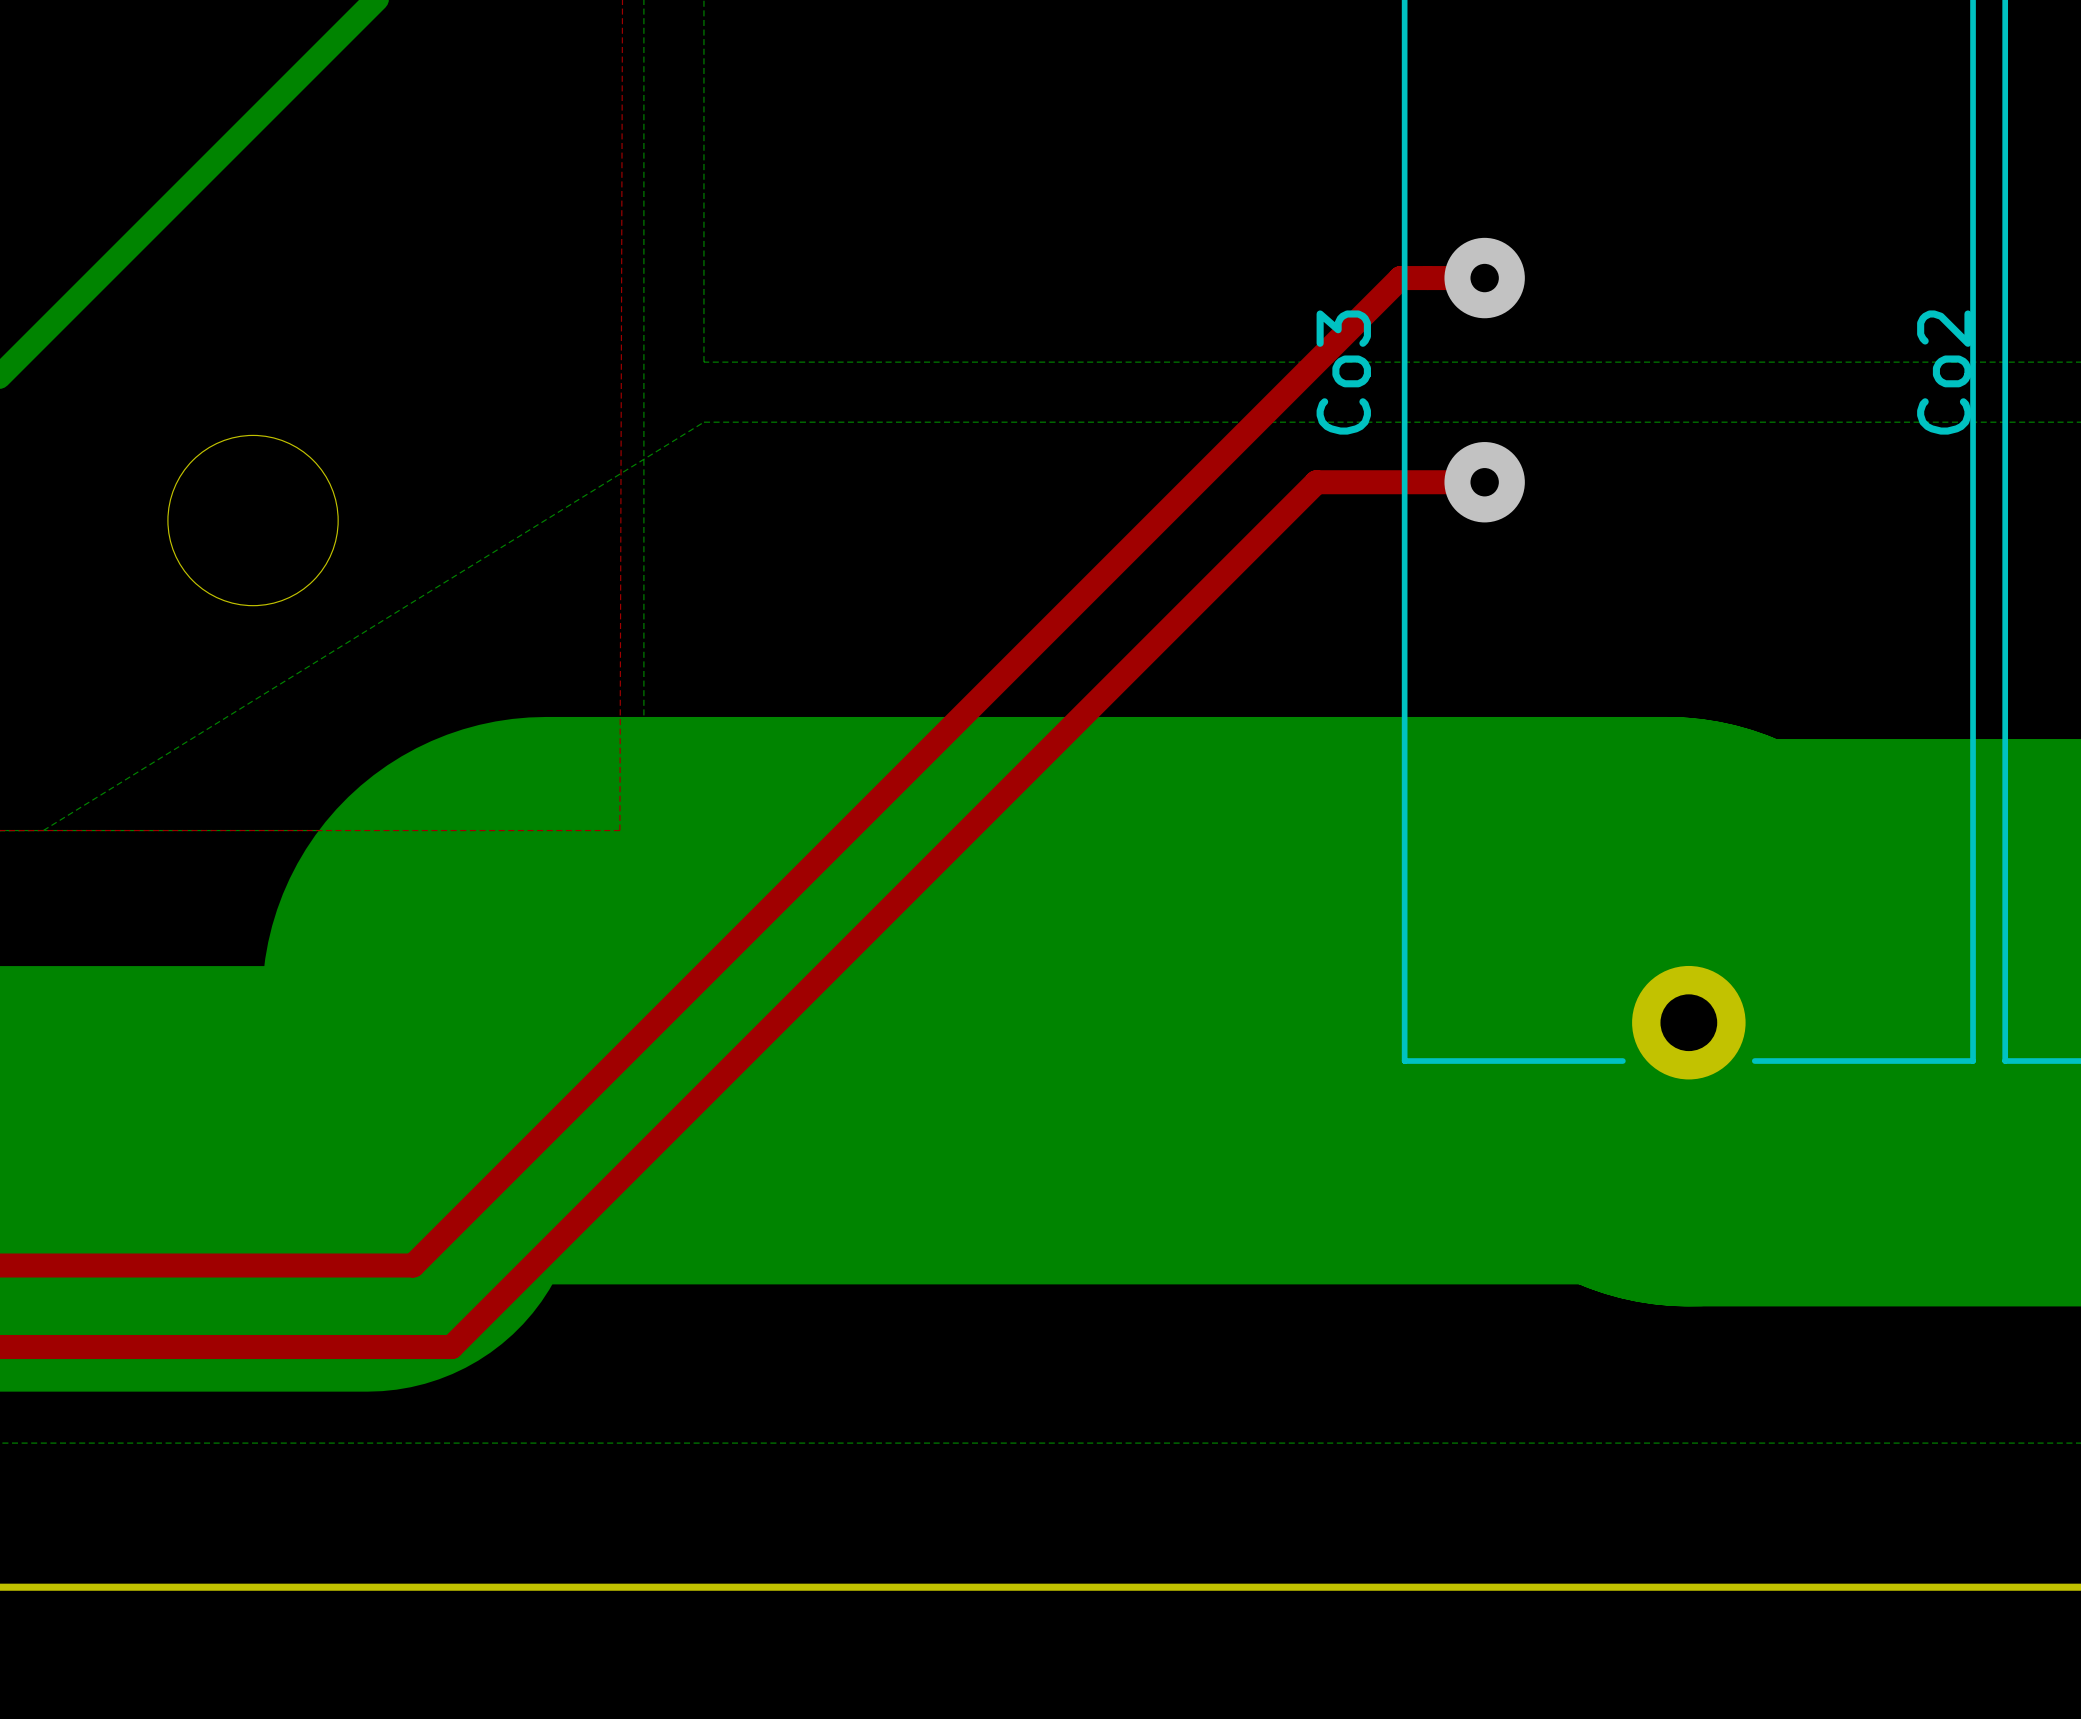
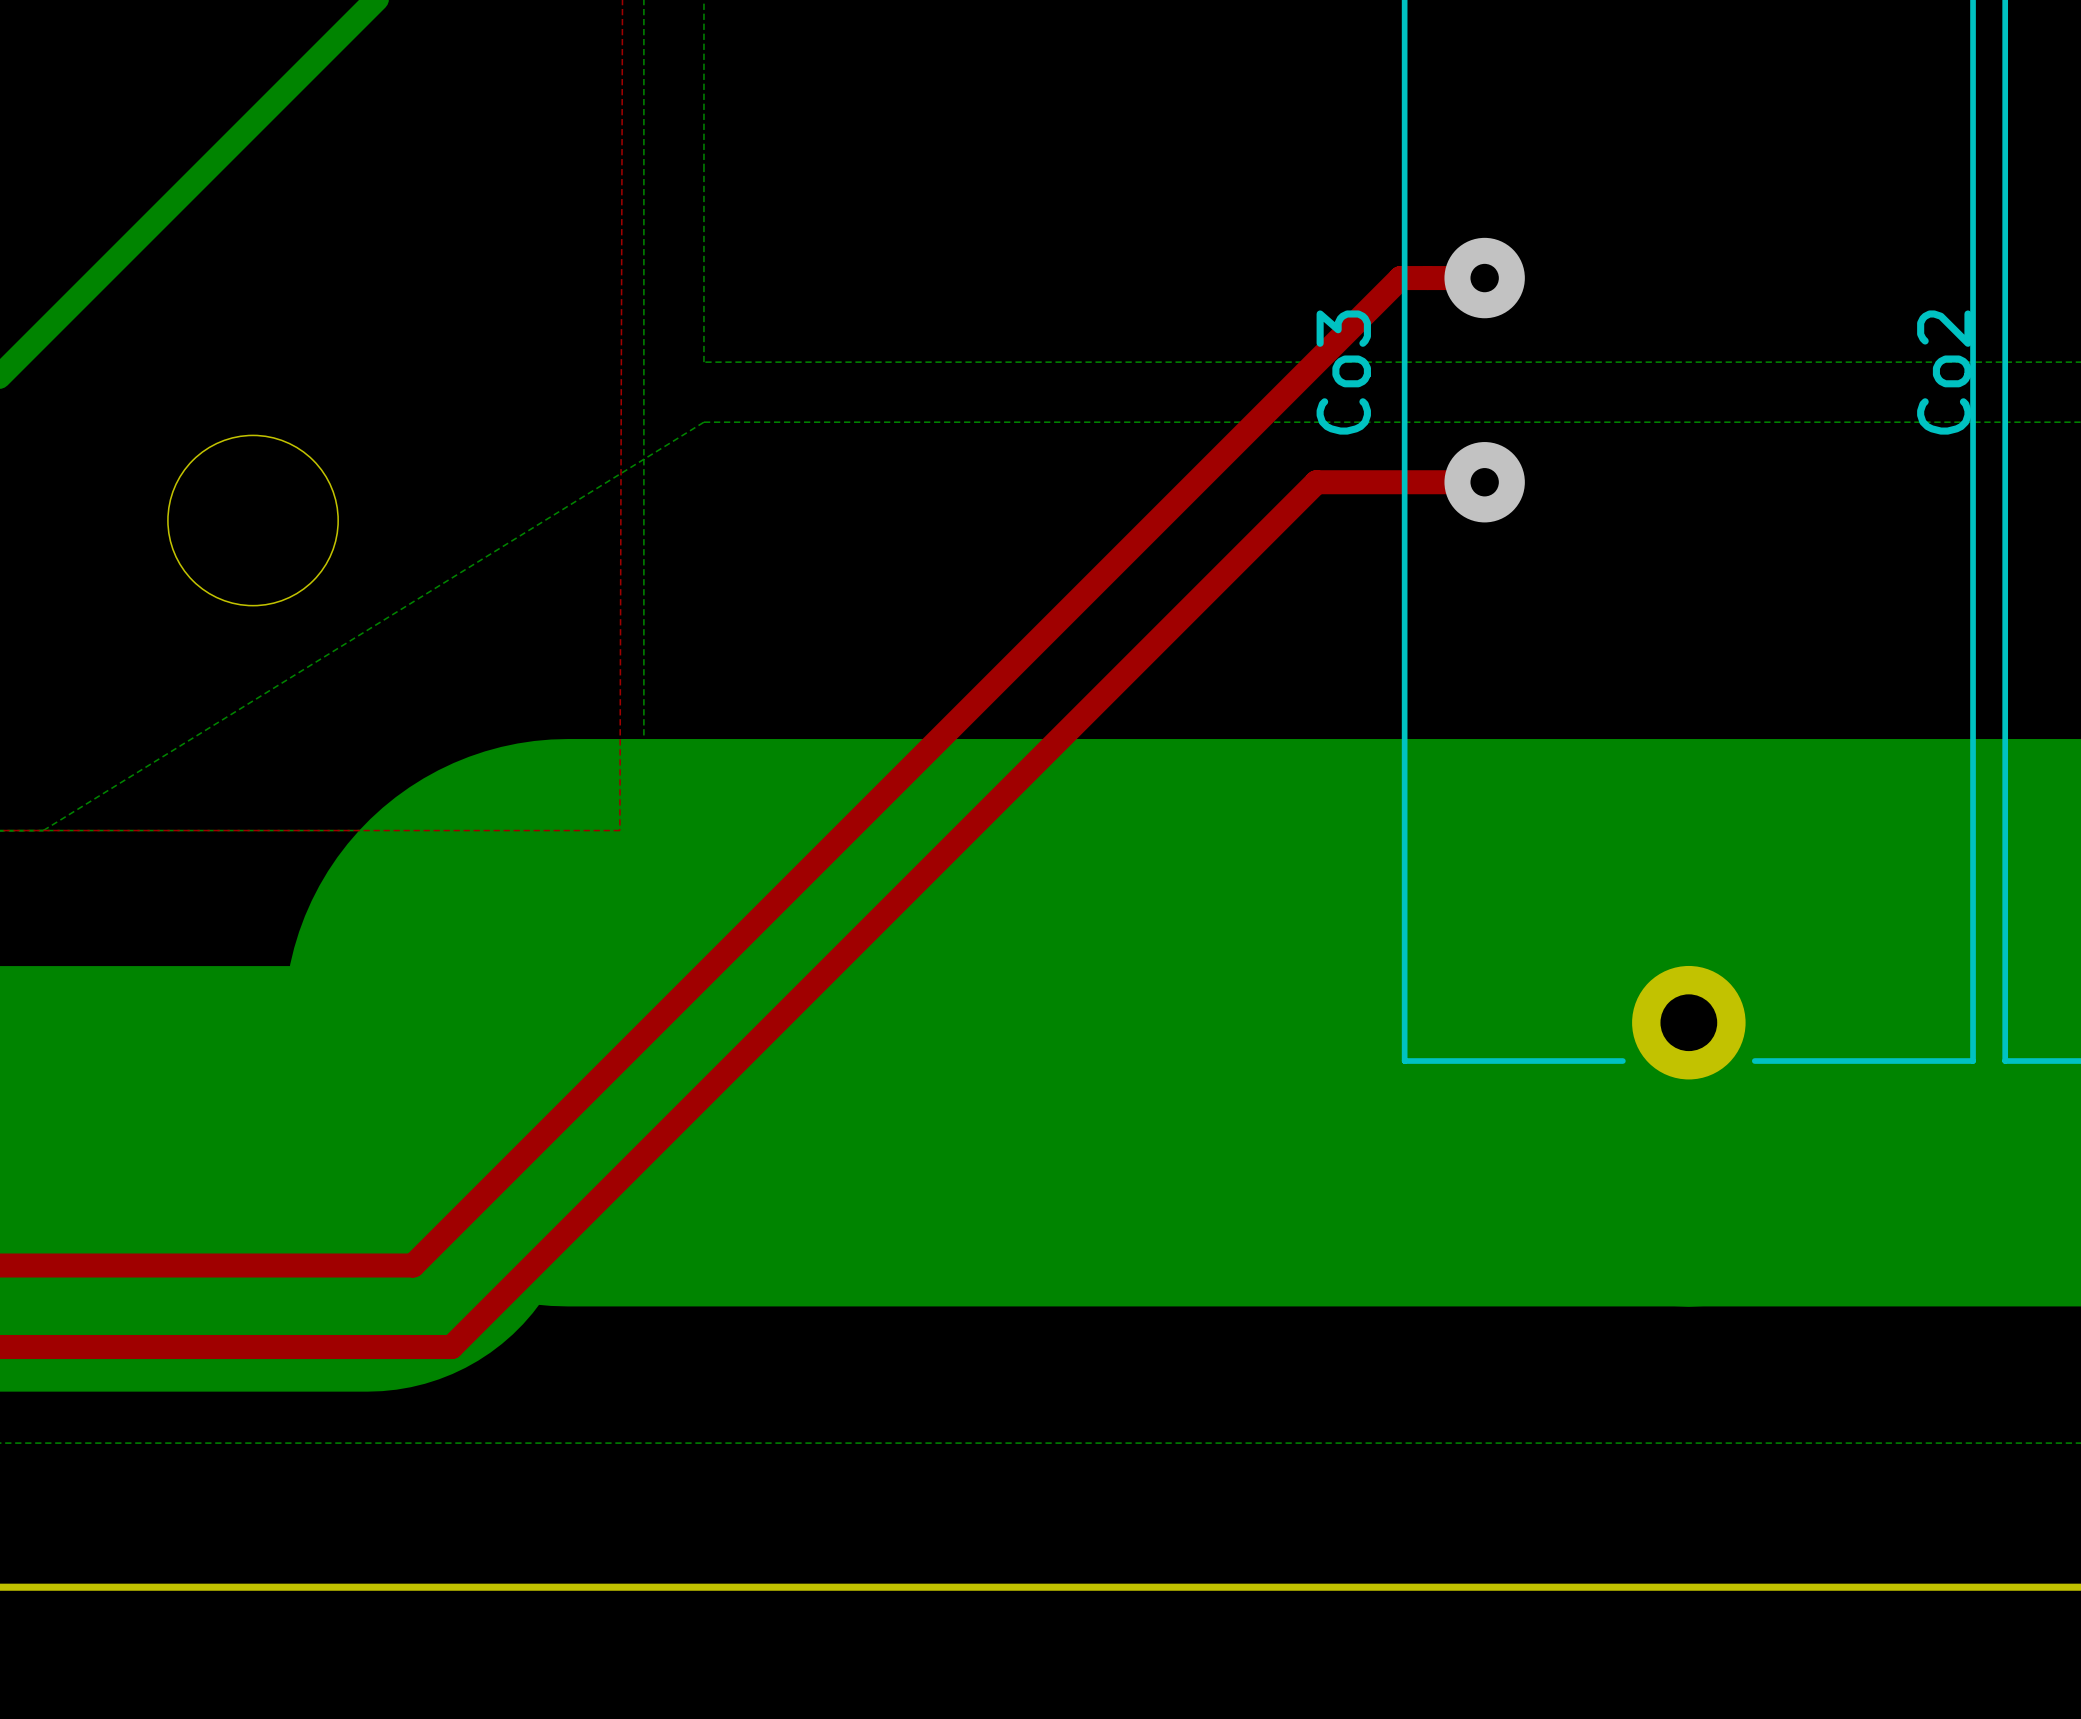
bottom track: (545, 1000) (1666, 1000) (1688, 1022) -> (567, 1022) (1688, 1022)

